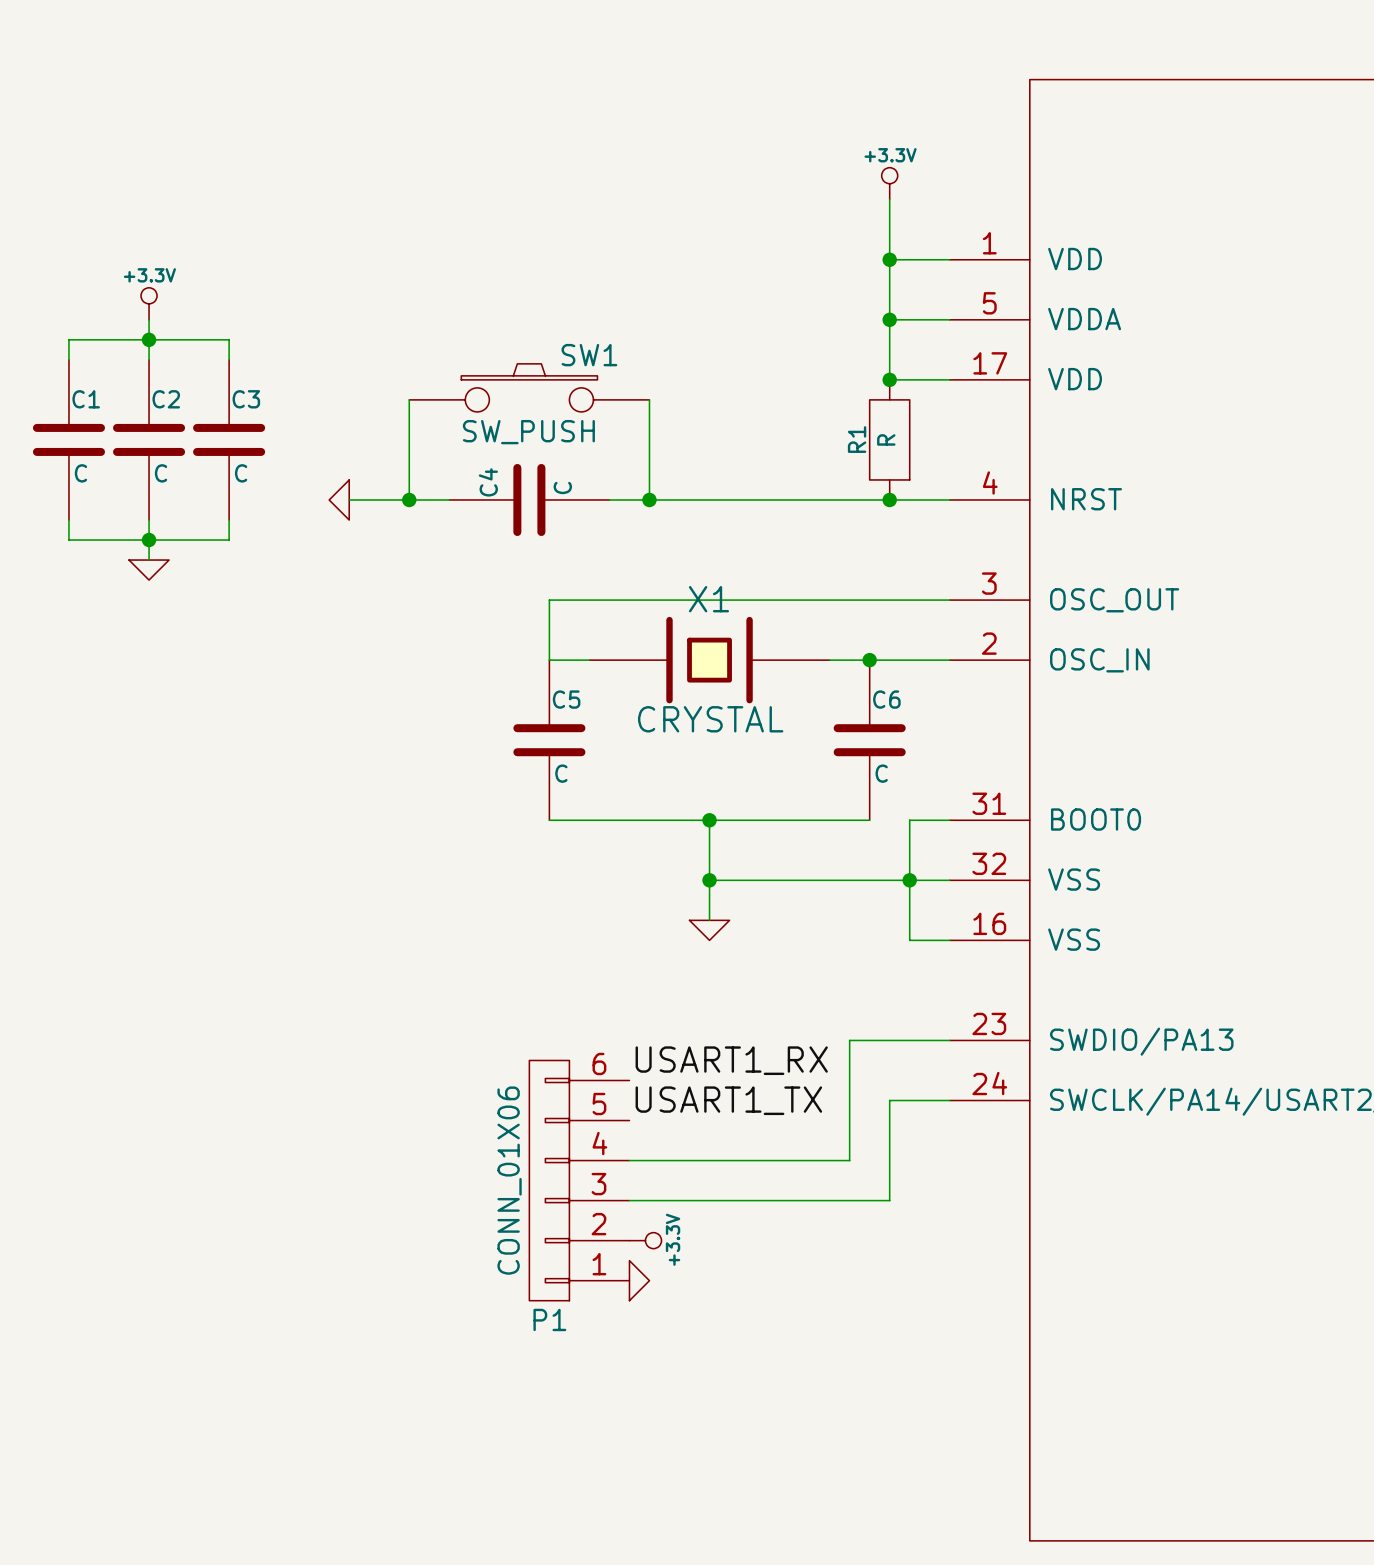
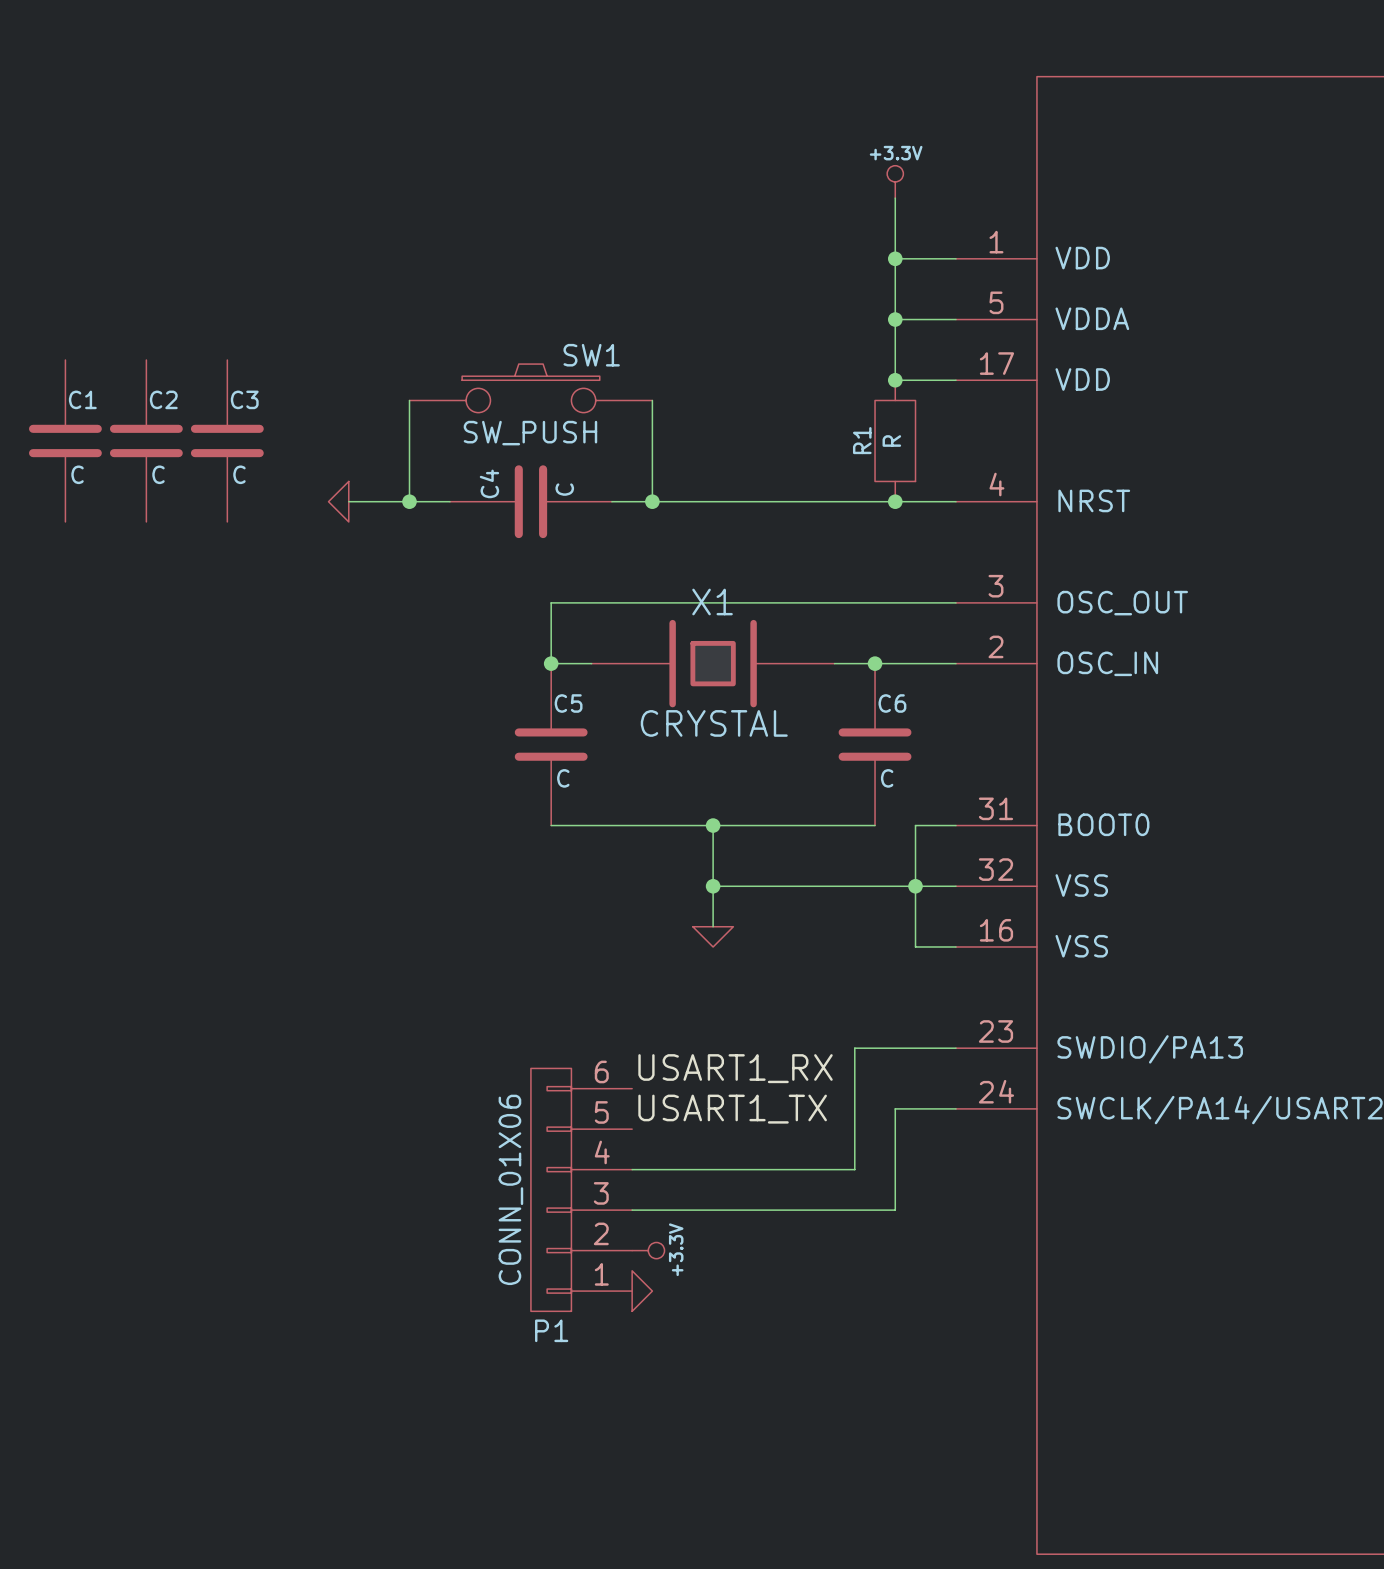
power symbol: +3.3V (149, 303) -> none
wire: (149, 319) (149, 359) -> none
junction: (149, 339) -> none
wire: (68, 359) (68, 339) (229, 339) (229, 359) -> none
wire: (68, 520) (68, 540) (229, 540) (229, 520) -> none
wire: (149, 520) (149, 560) -> none
junction: (149, 540) -> none
power symbol: (149, 570) -> none
junction: none -> (551, 663)

